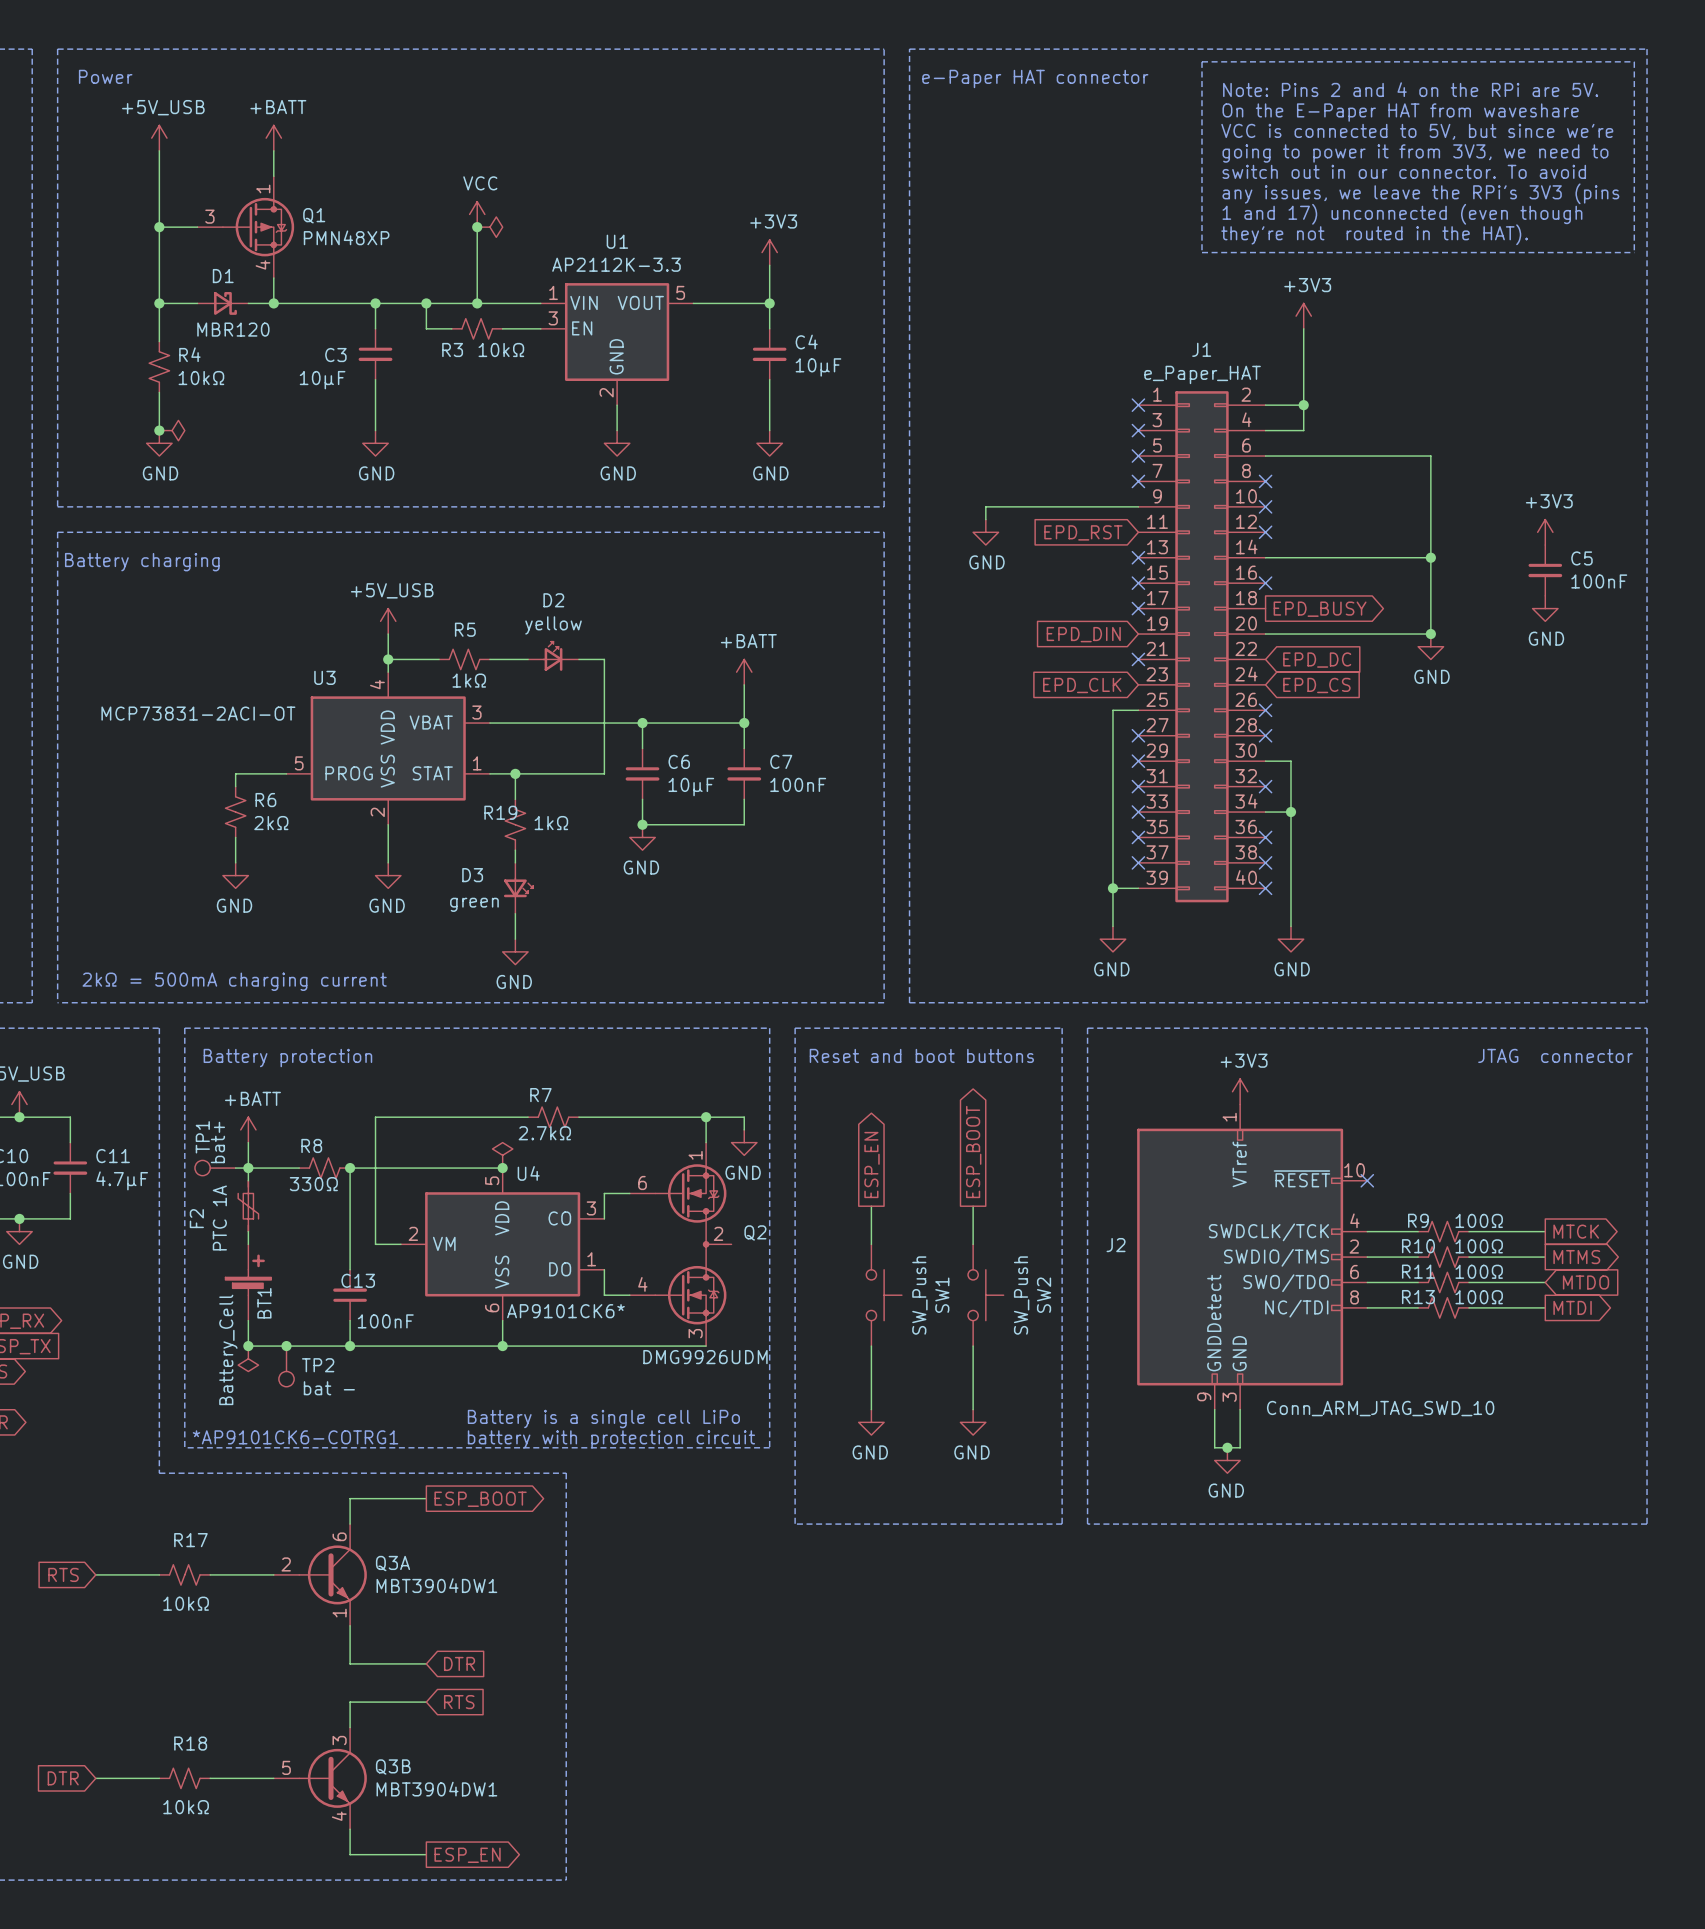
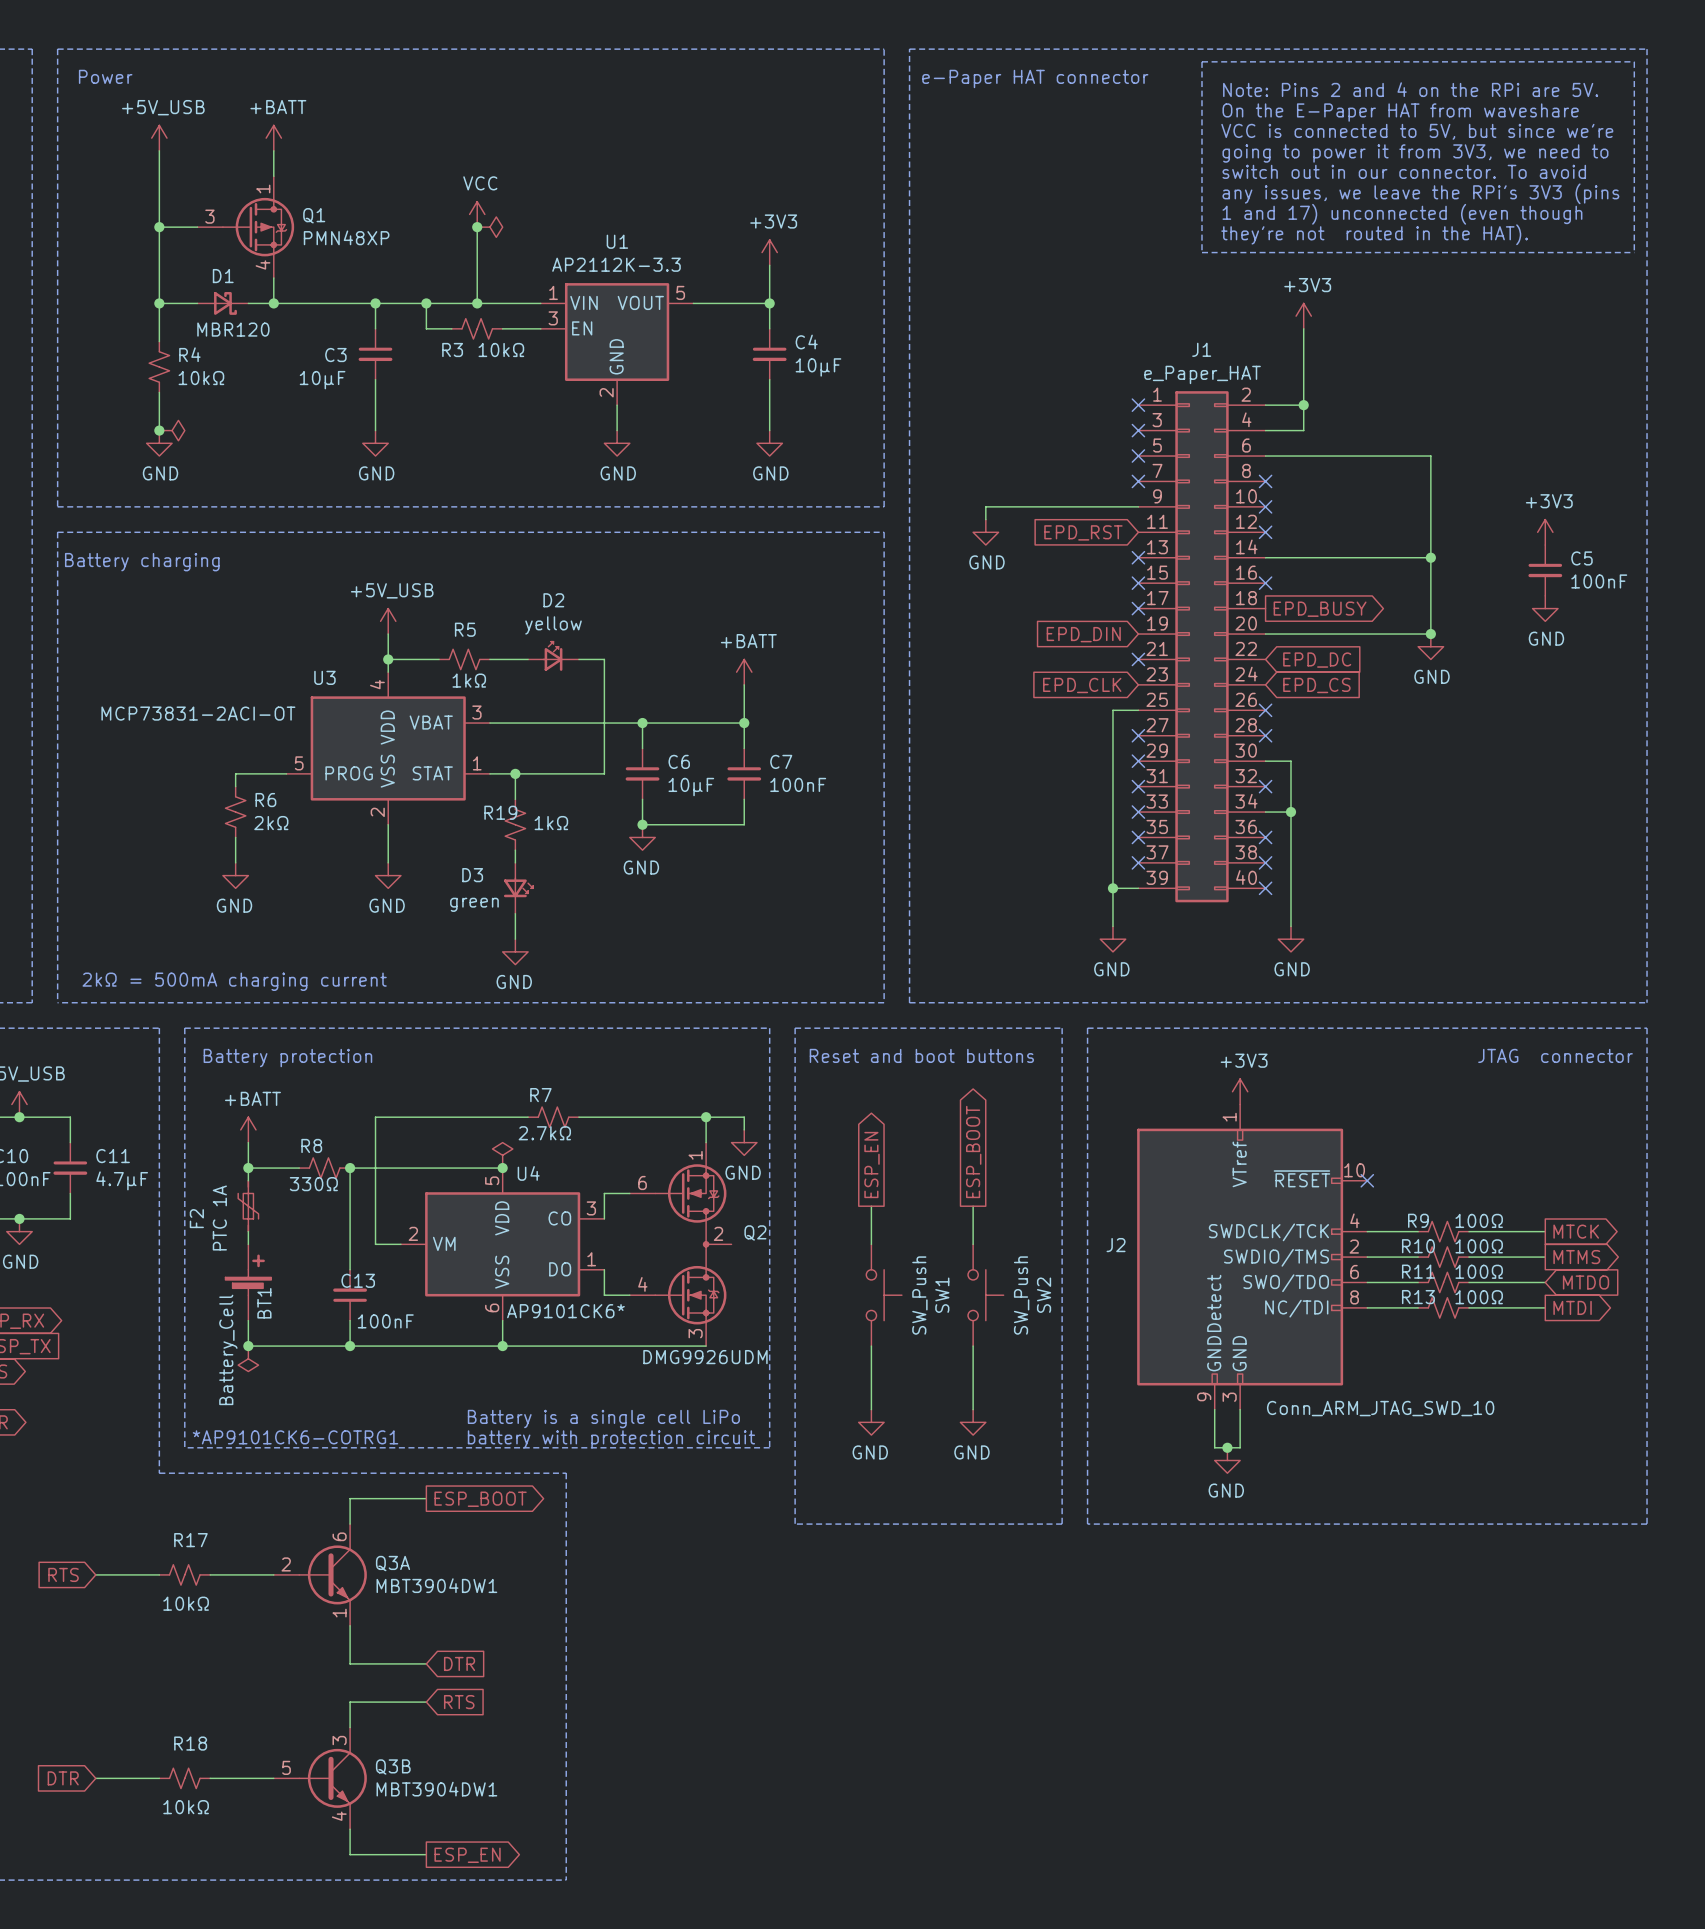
TP1: bat+ (215, 1168) -> none
wire: (235, 1168) (248, 1168) -> none
junction: (286, 1346) -> none
TP2: bat - (286, 1366) -> none

